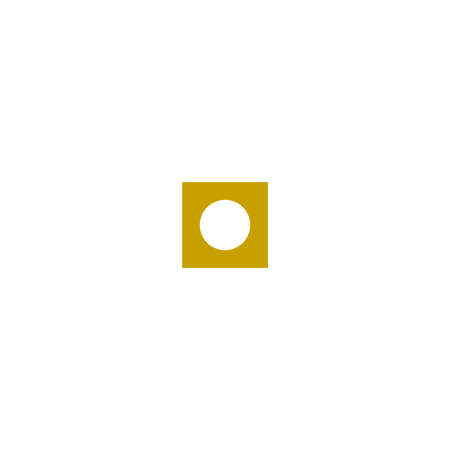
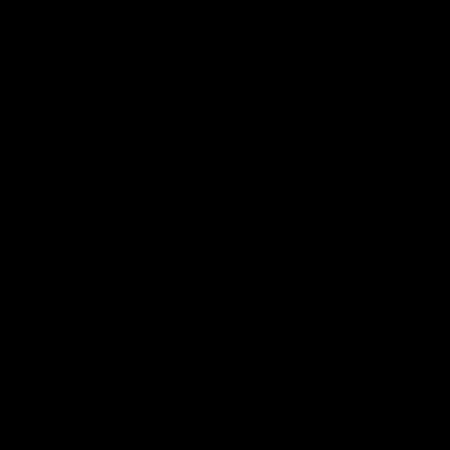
part: (225, 225) -> none

